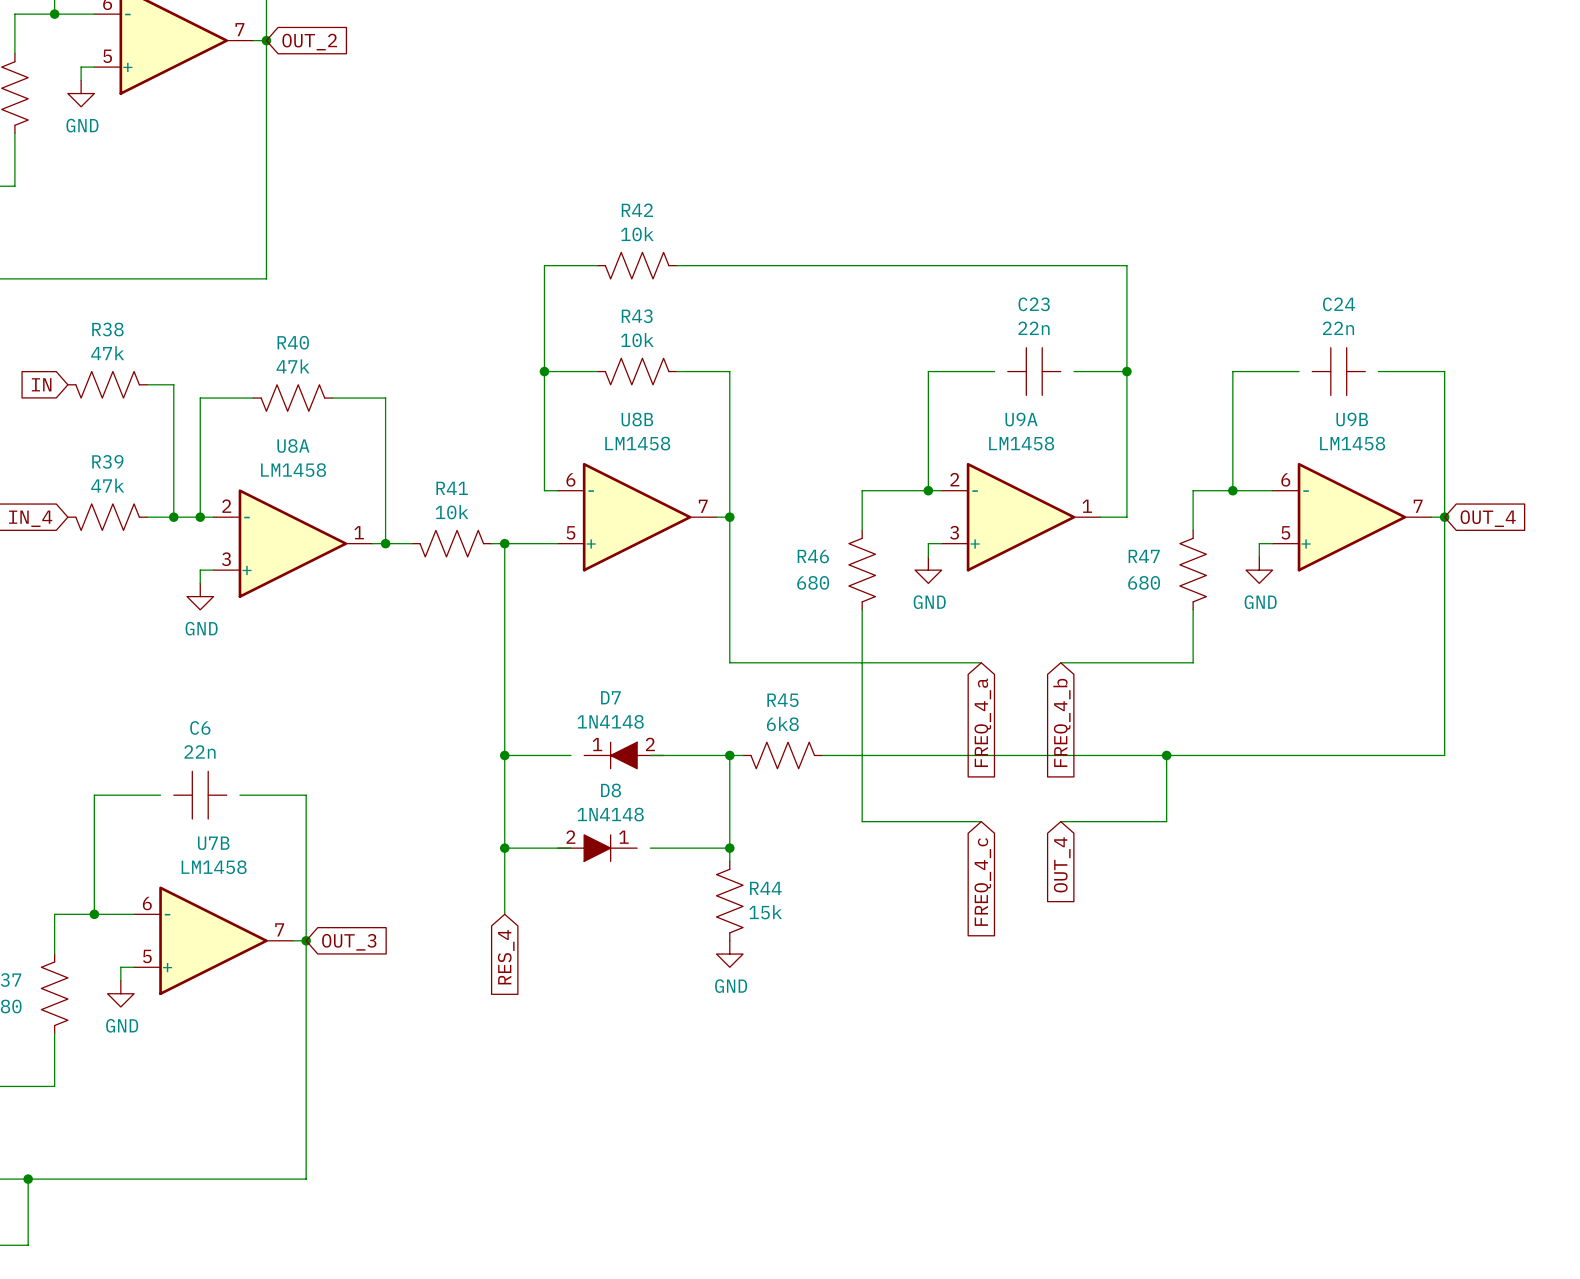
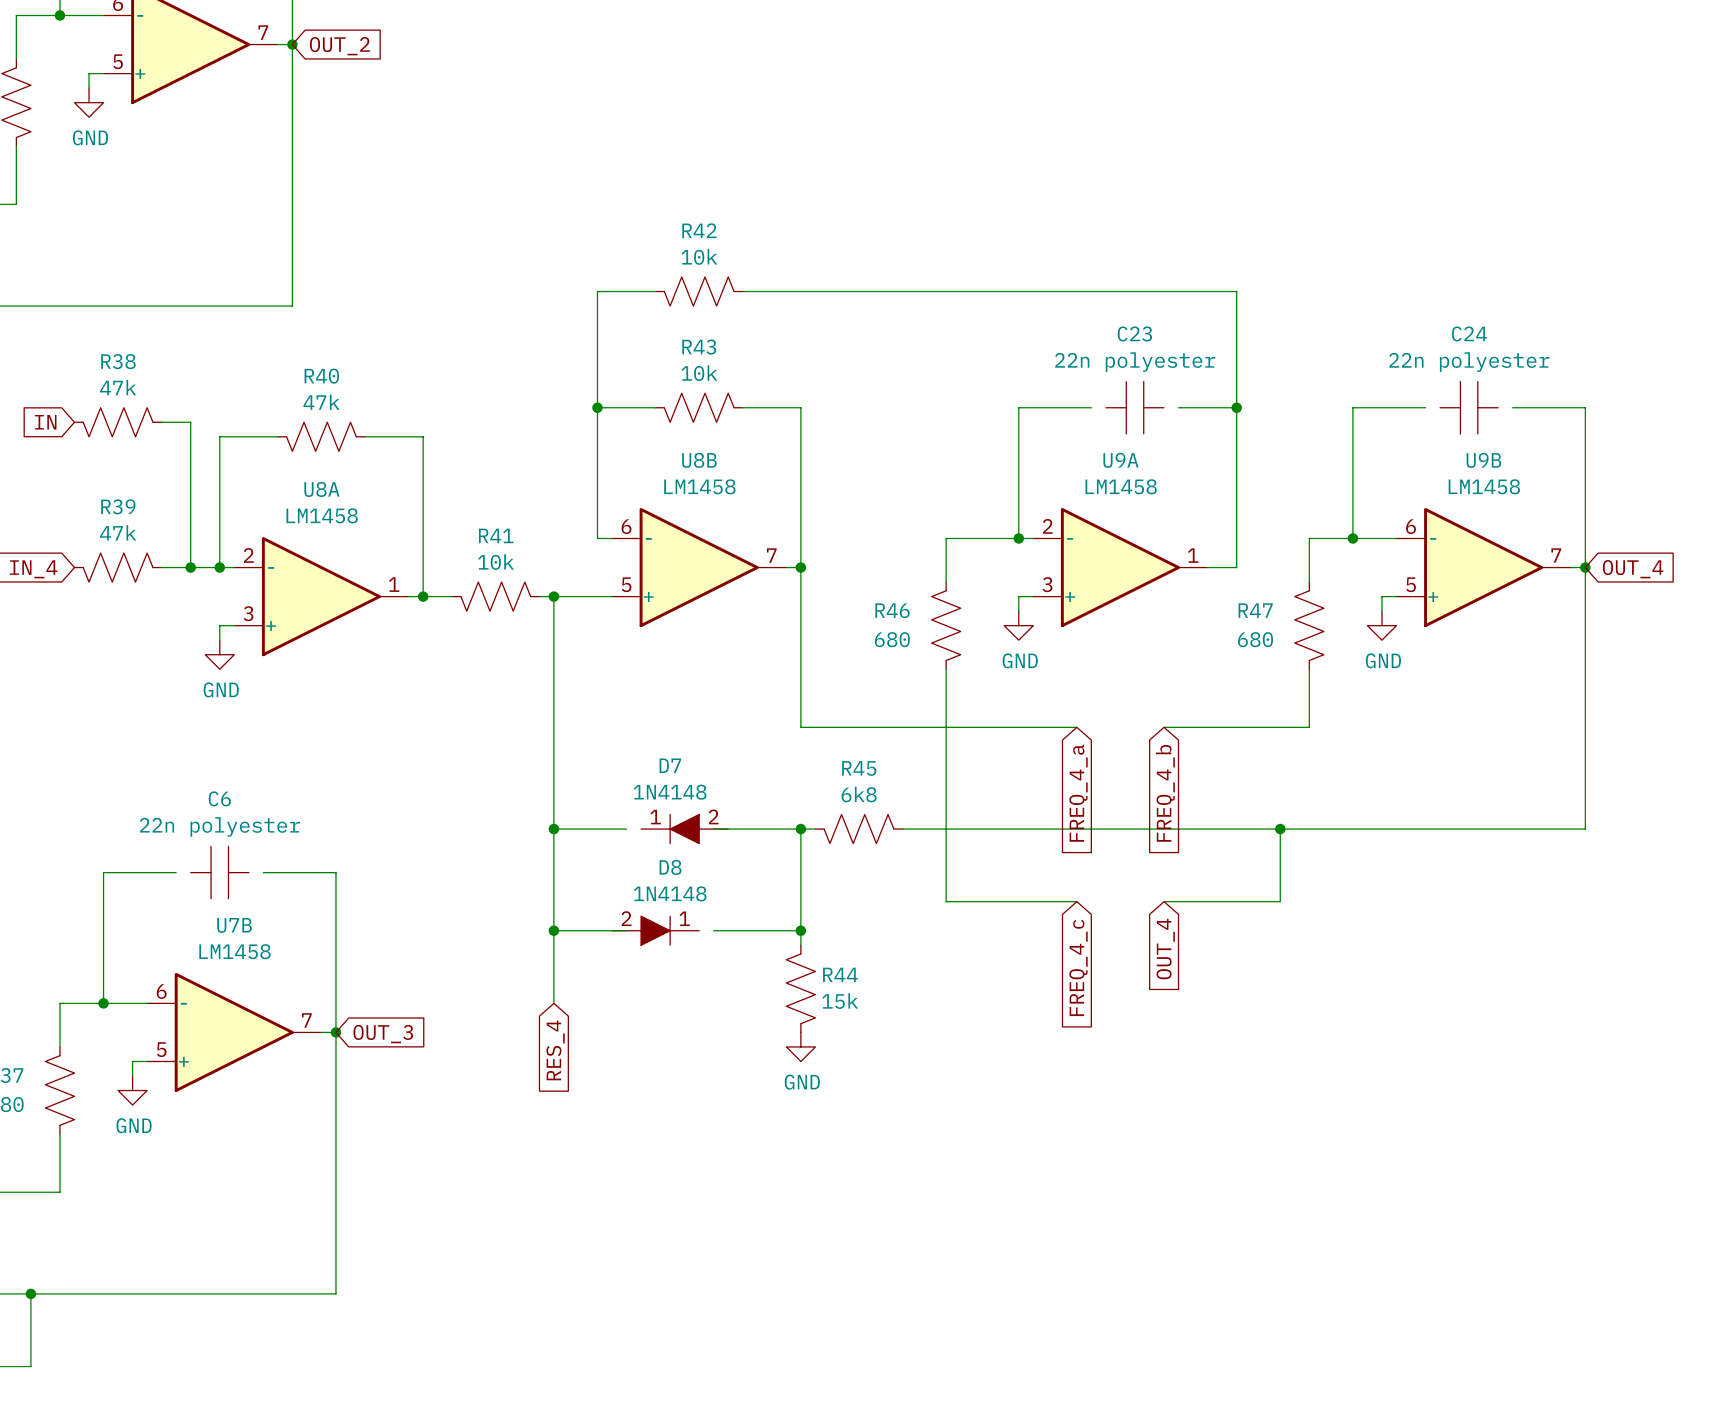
C23 value: 22n (1034, 328) -> 22n polyester (1135, 362)
C24 value: 22n (1338, 328) -> 22n polyester (1469, 362)
C6 value: 22n (200, 751) -> 22n polyester (220, 826)

